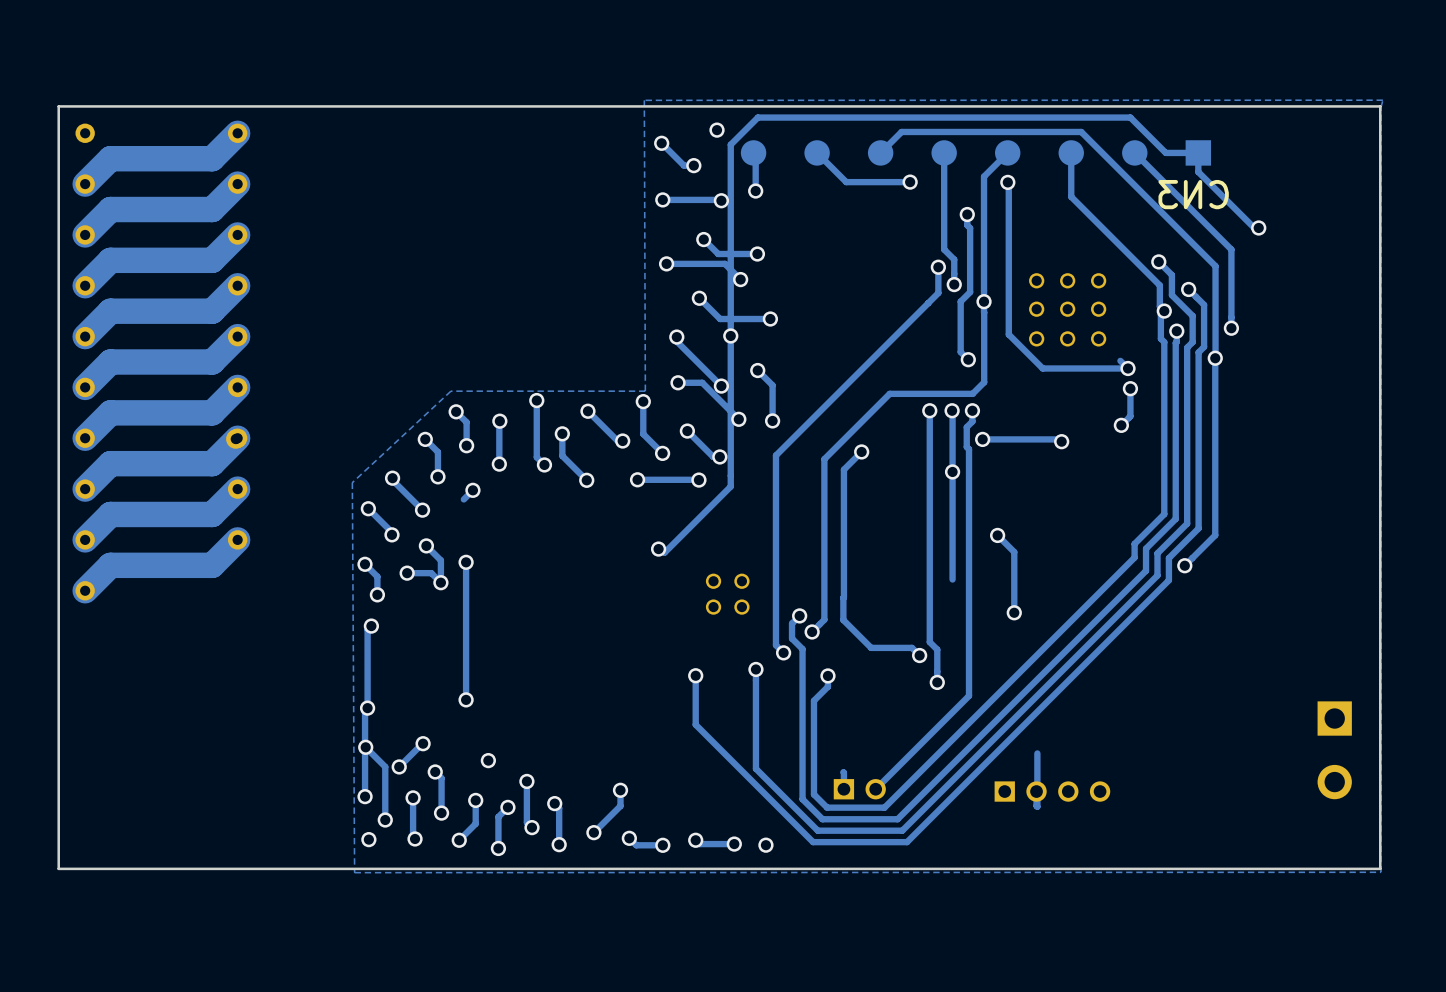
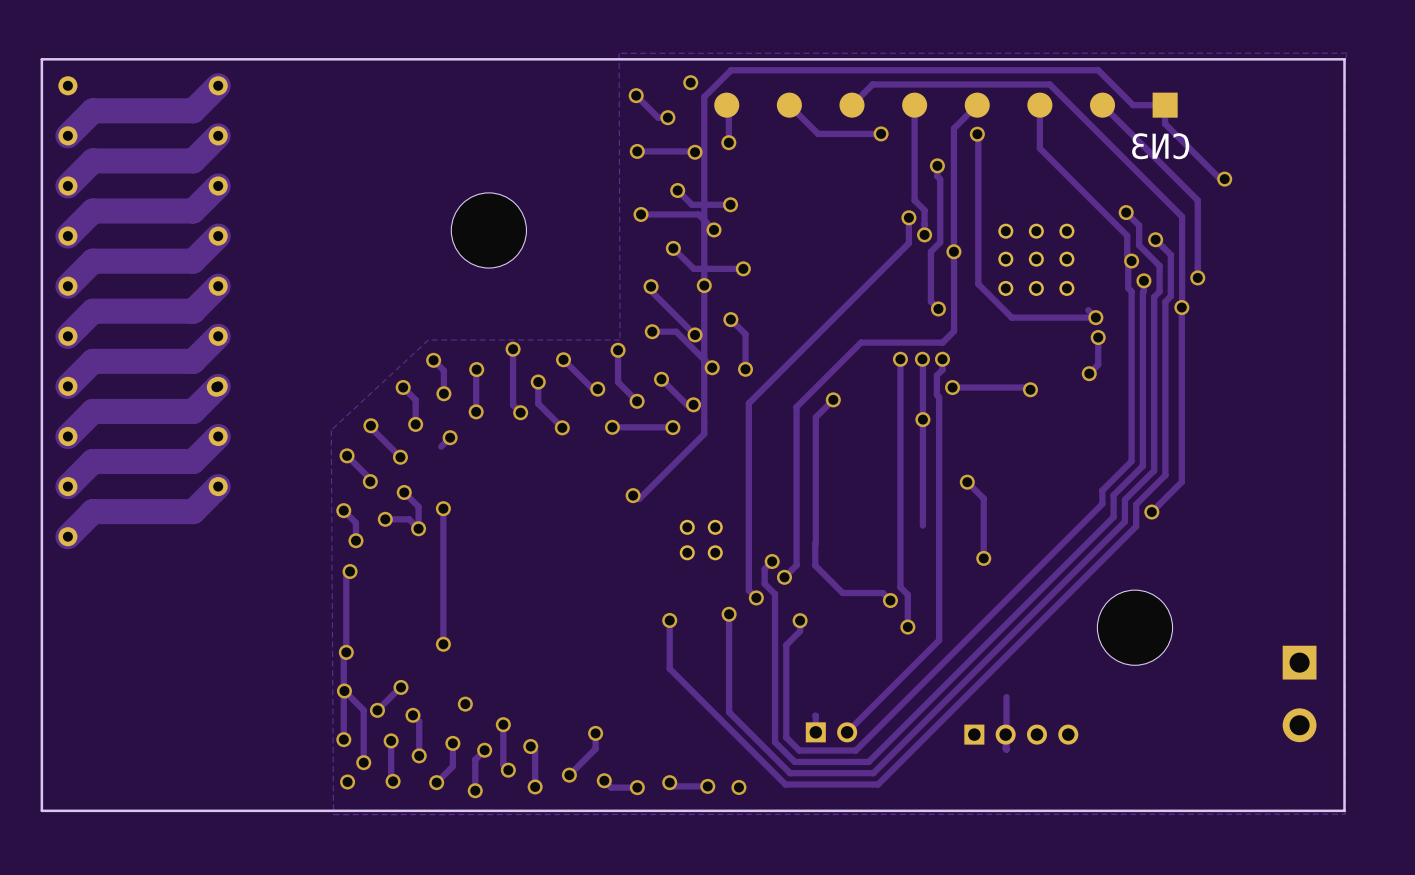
part: none -> (488, 230)
part: none -> (1134, 627)

